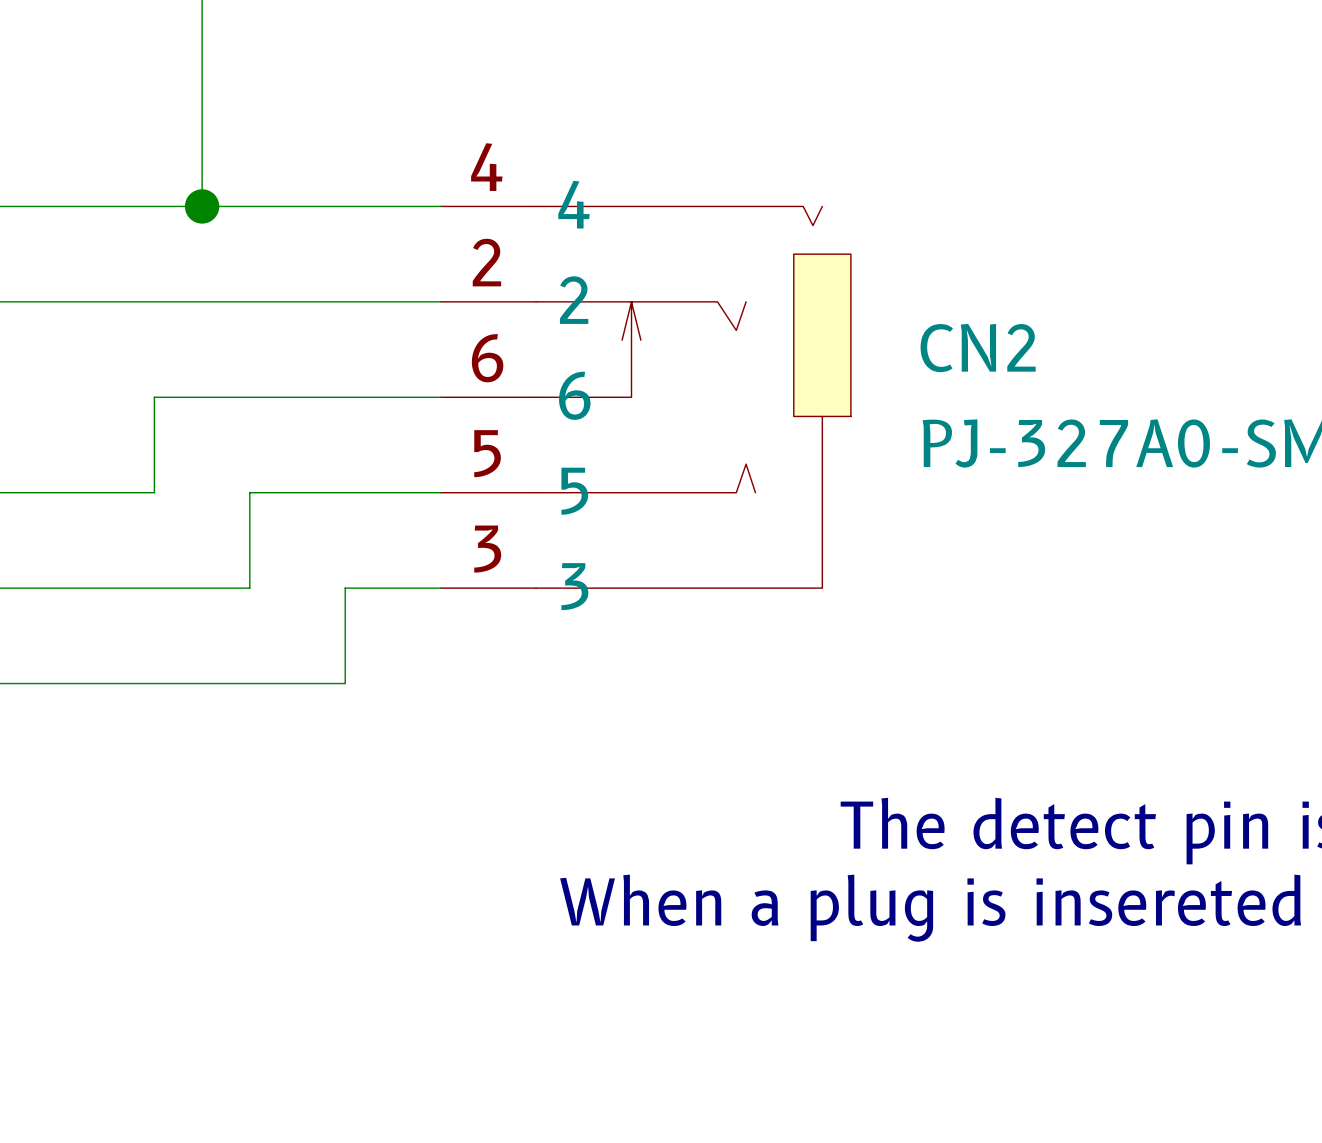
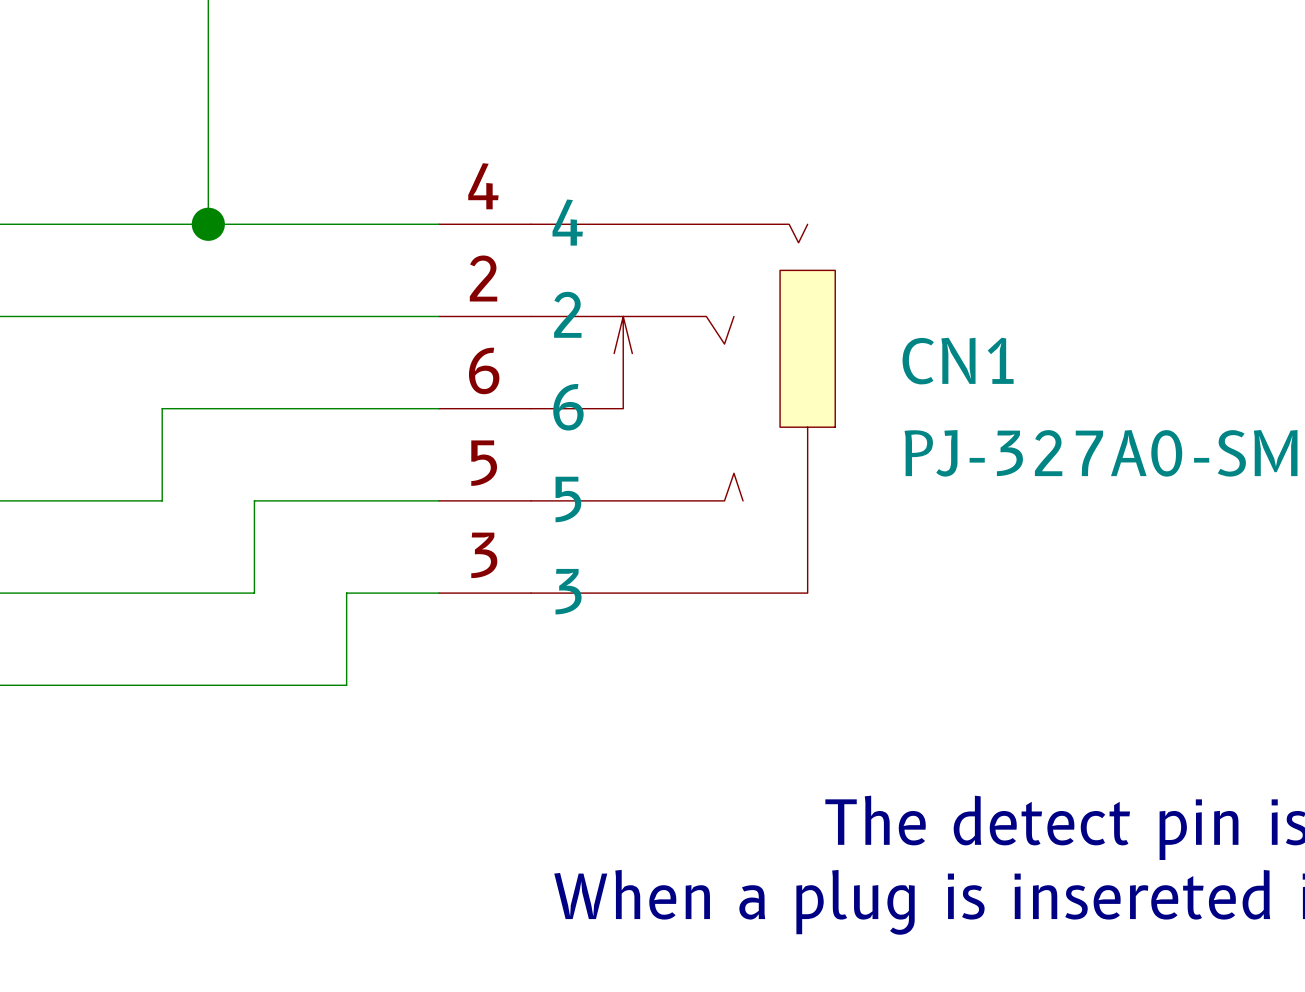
CN2 name: CN2 (978, 348) -> CN1 (958, 361)

